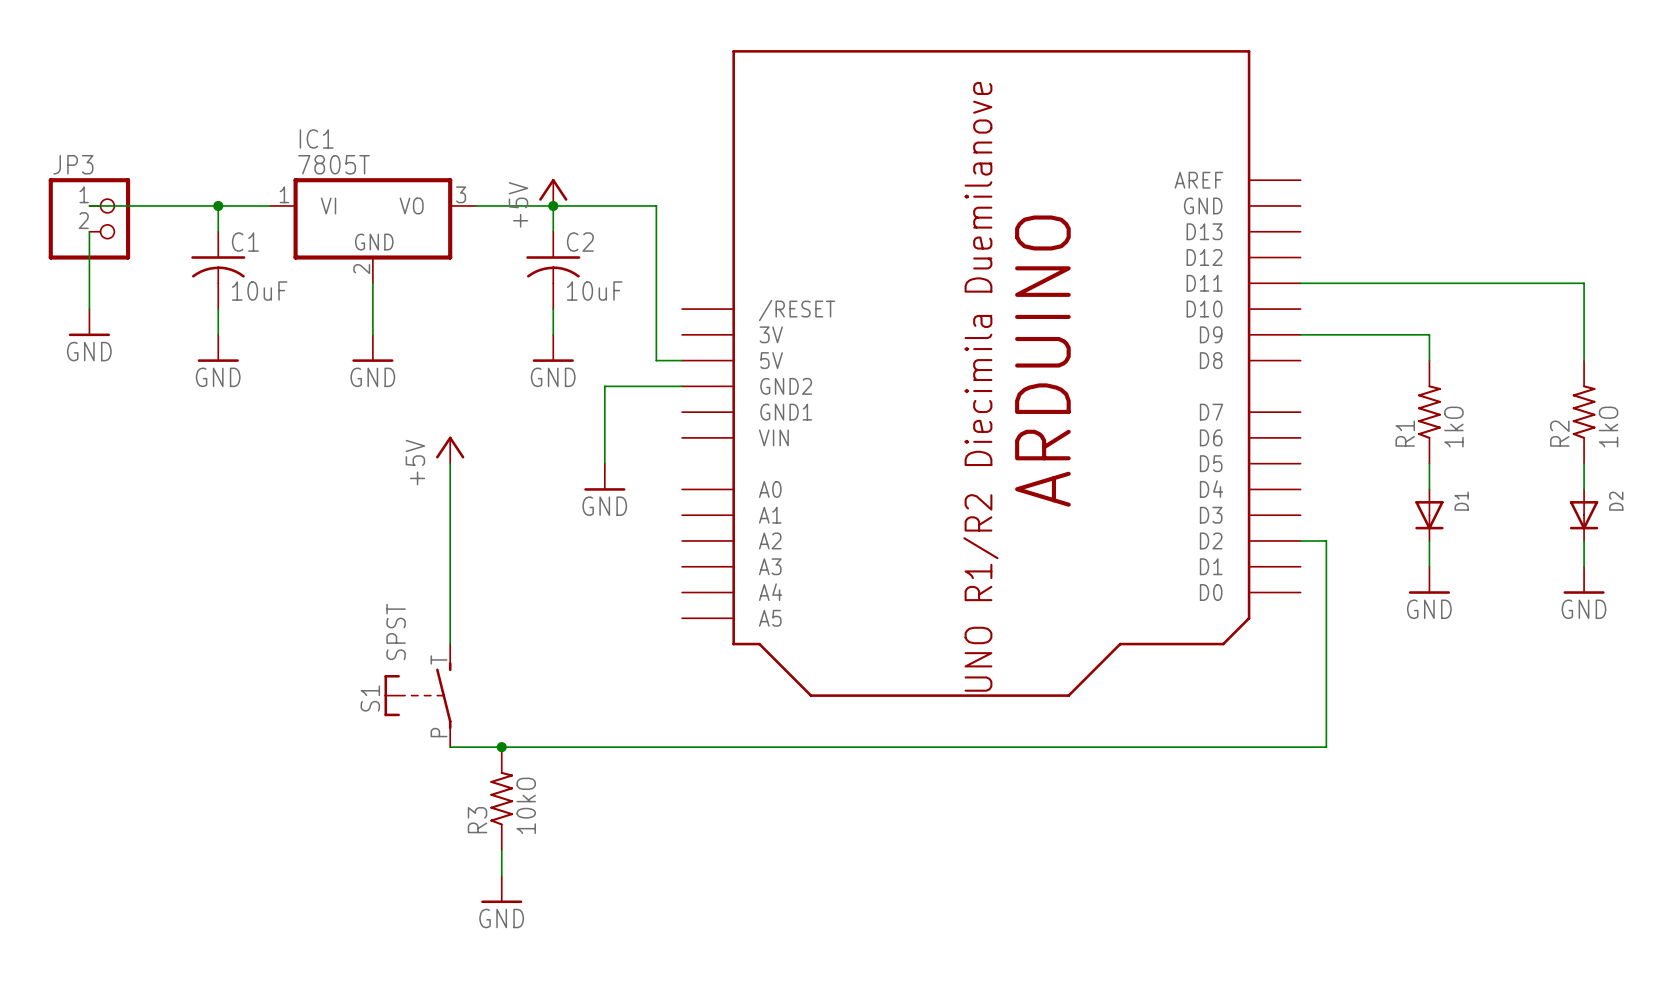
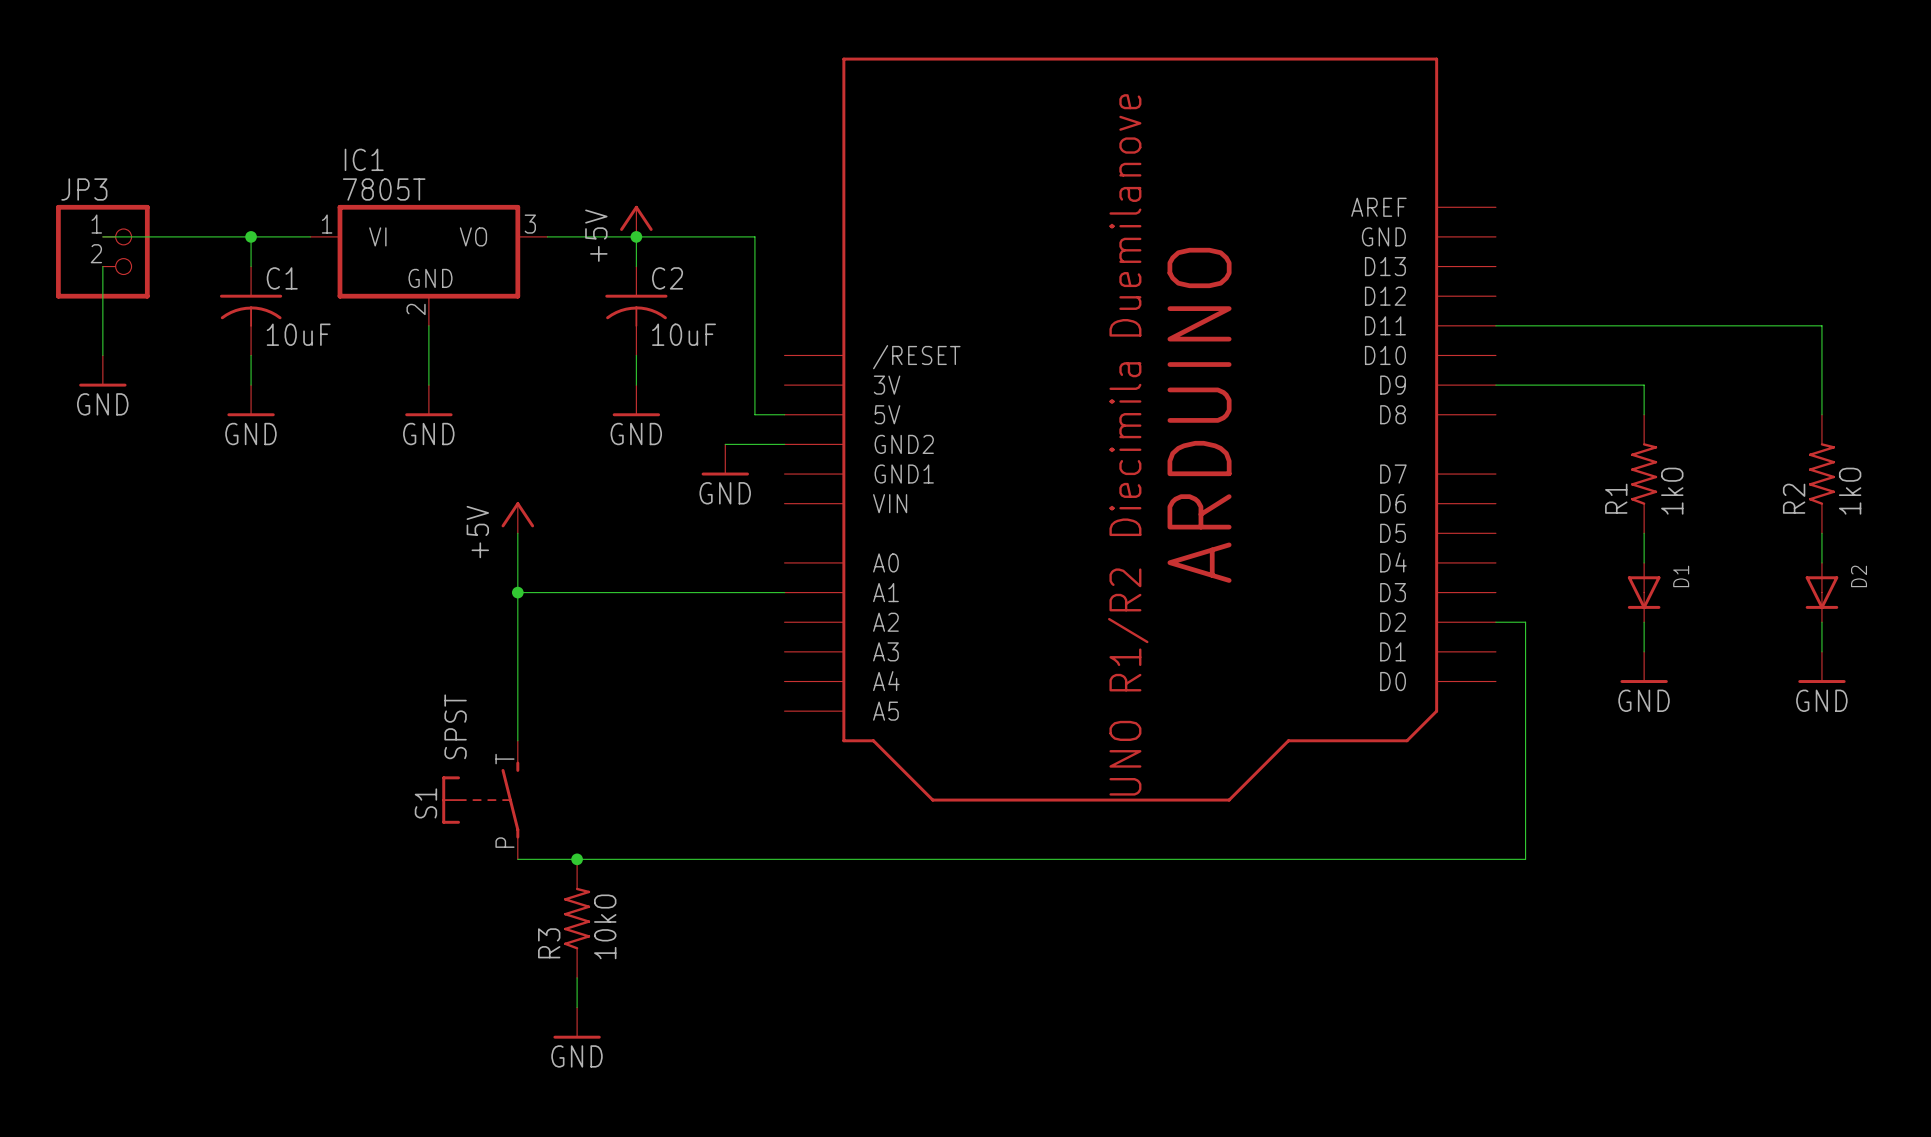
wire: (630, 386) (604, 386) (604, 463) -> none
power symbol position: GND (604, 477) -> GND (725, 459)
wire: none -> (517, 592) (784, 592)
junction: none -> (517, 592)

